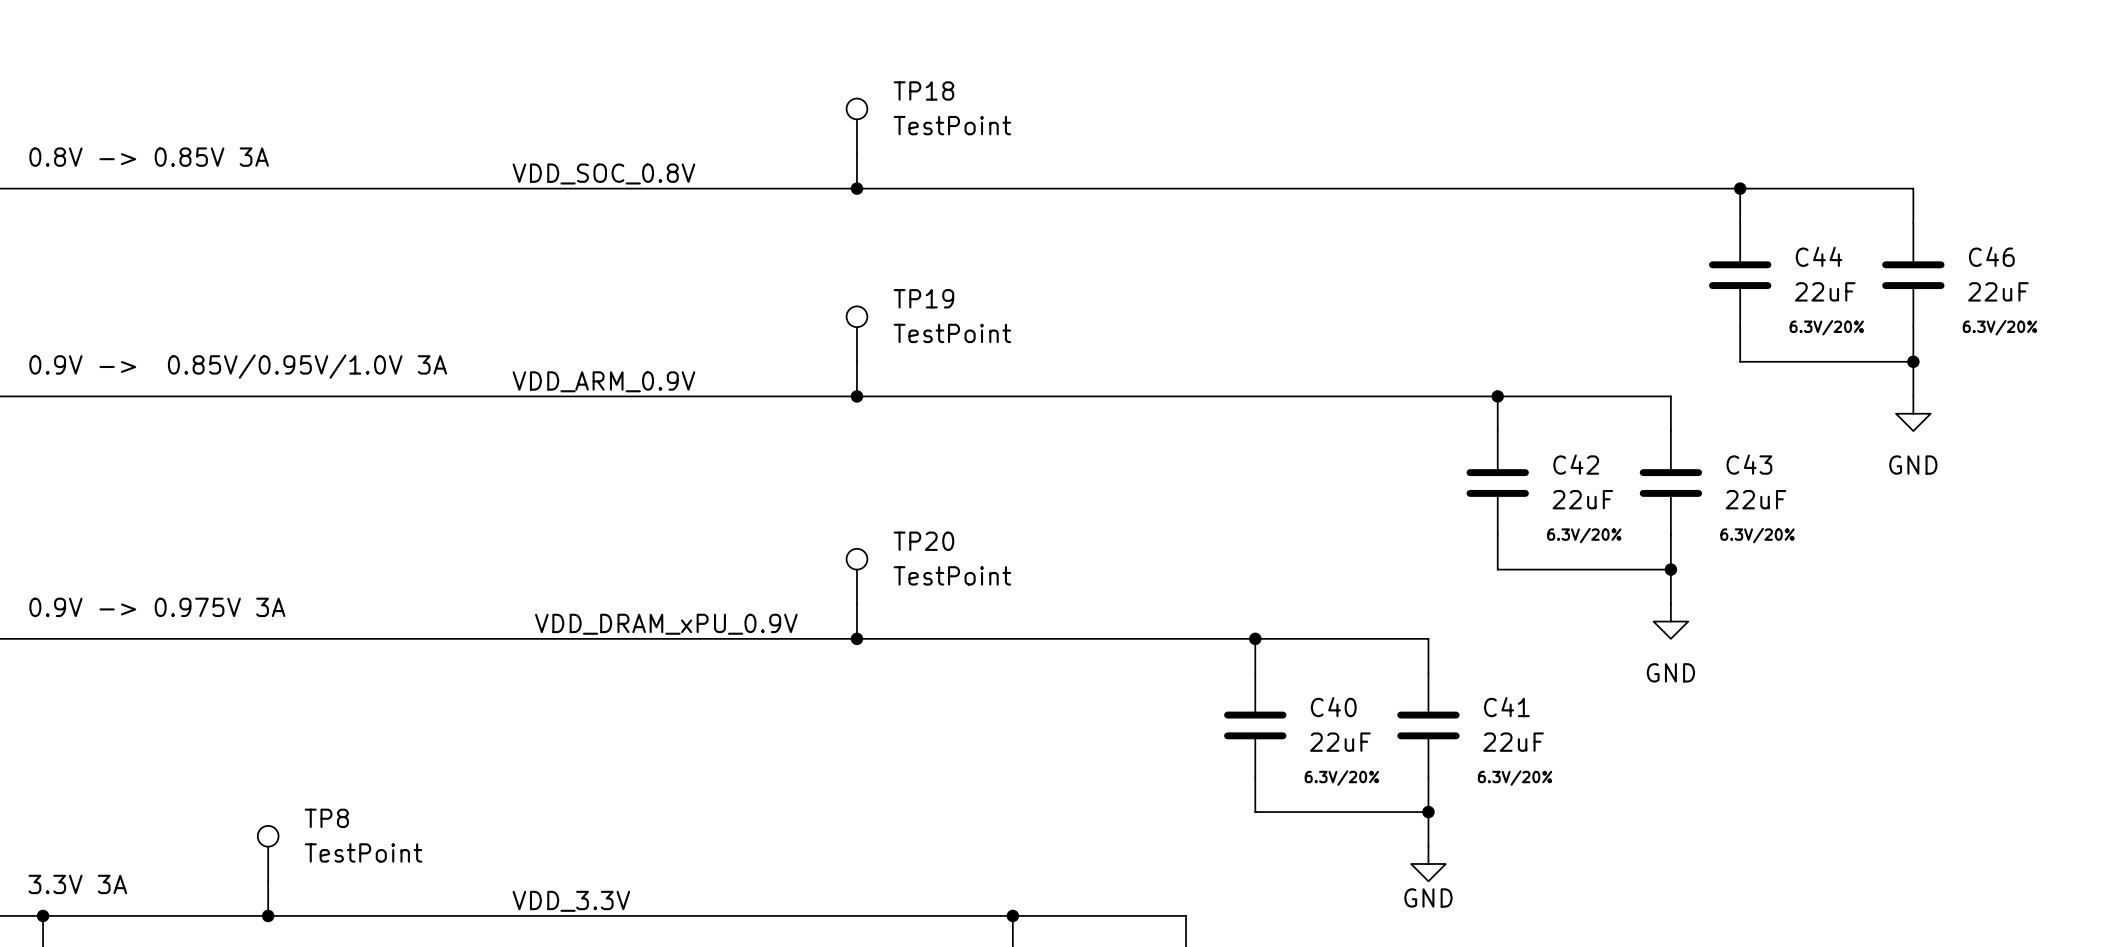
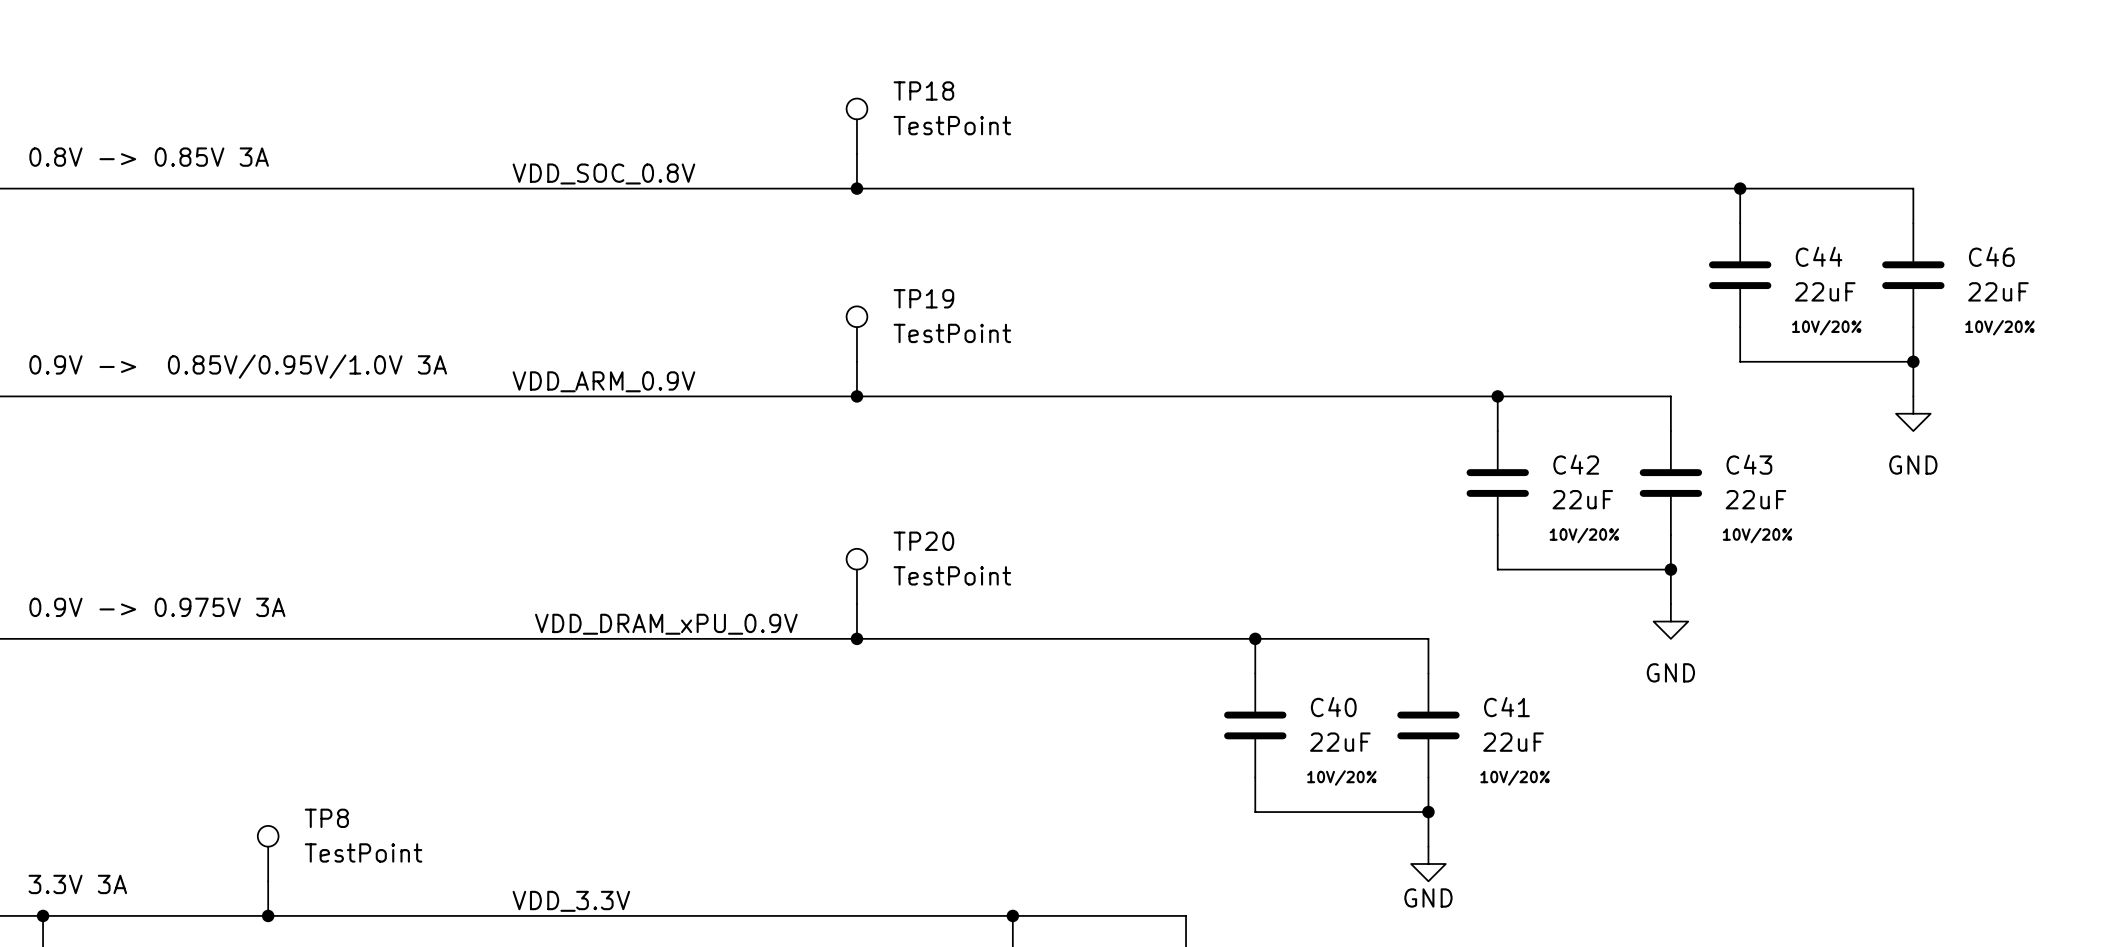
C44 text: 6.3V/20% (1826, 327) -> 10V/20% (1826, 327)
C46 text: 6.3V/20% (1999, 327) -> 10V/20% (1999, 327)
C42 text: 6.3V/20% (1584, 535) -> 10V/20% (1584, 535)
C43 text: 6.3V/20% (1757, 535) -> 10V/20% (1757, 535)
C40 text: 6.3V/20% (1341, 778) -> 10V/20% (1341, 778)
C41 text: 6.3V/20% (1515, 778) -> 10V/20% (1515, 778)

